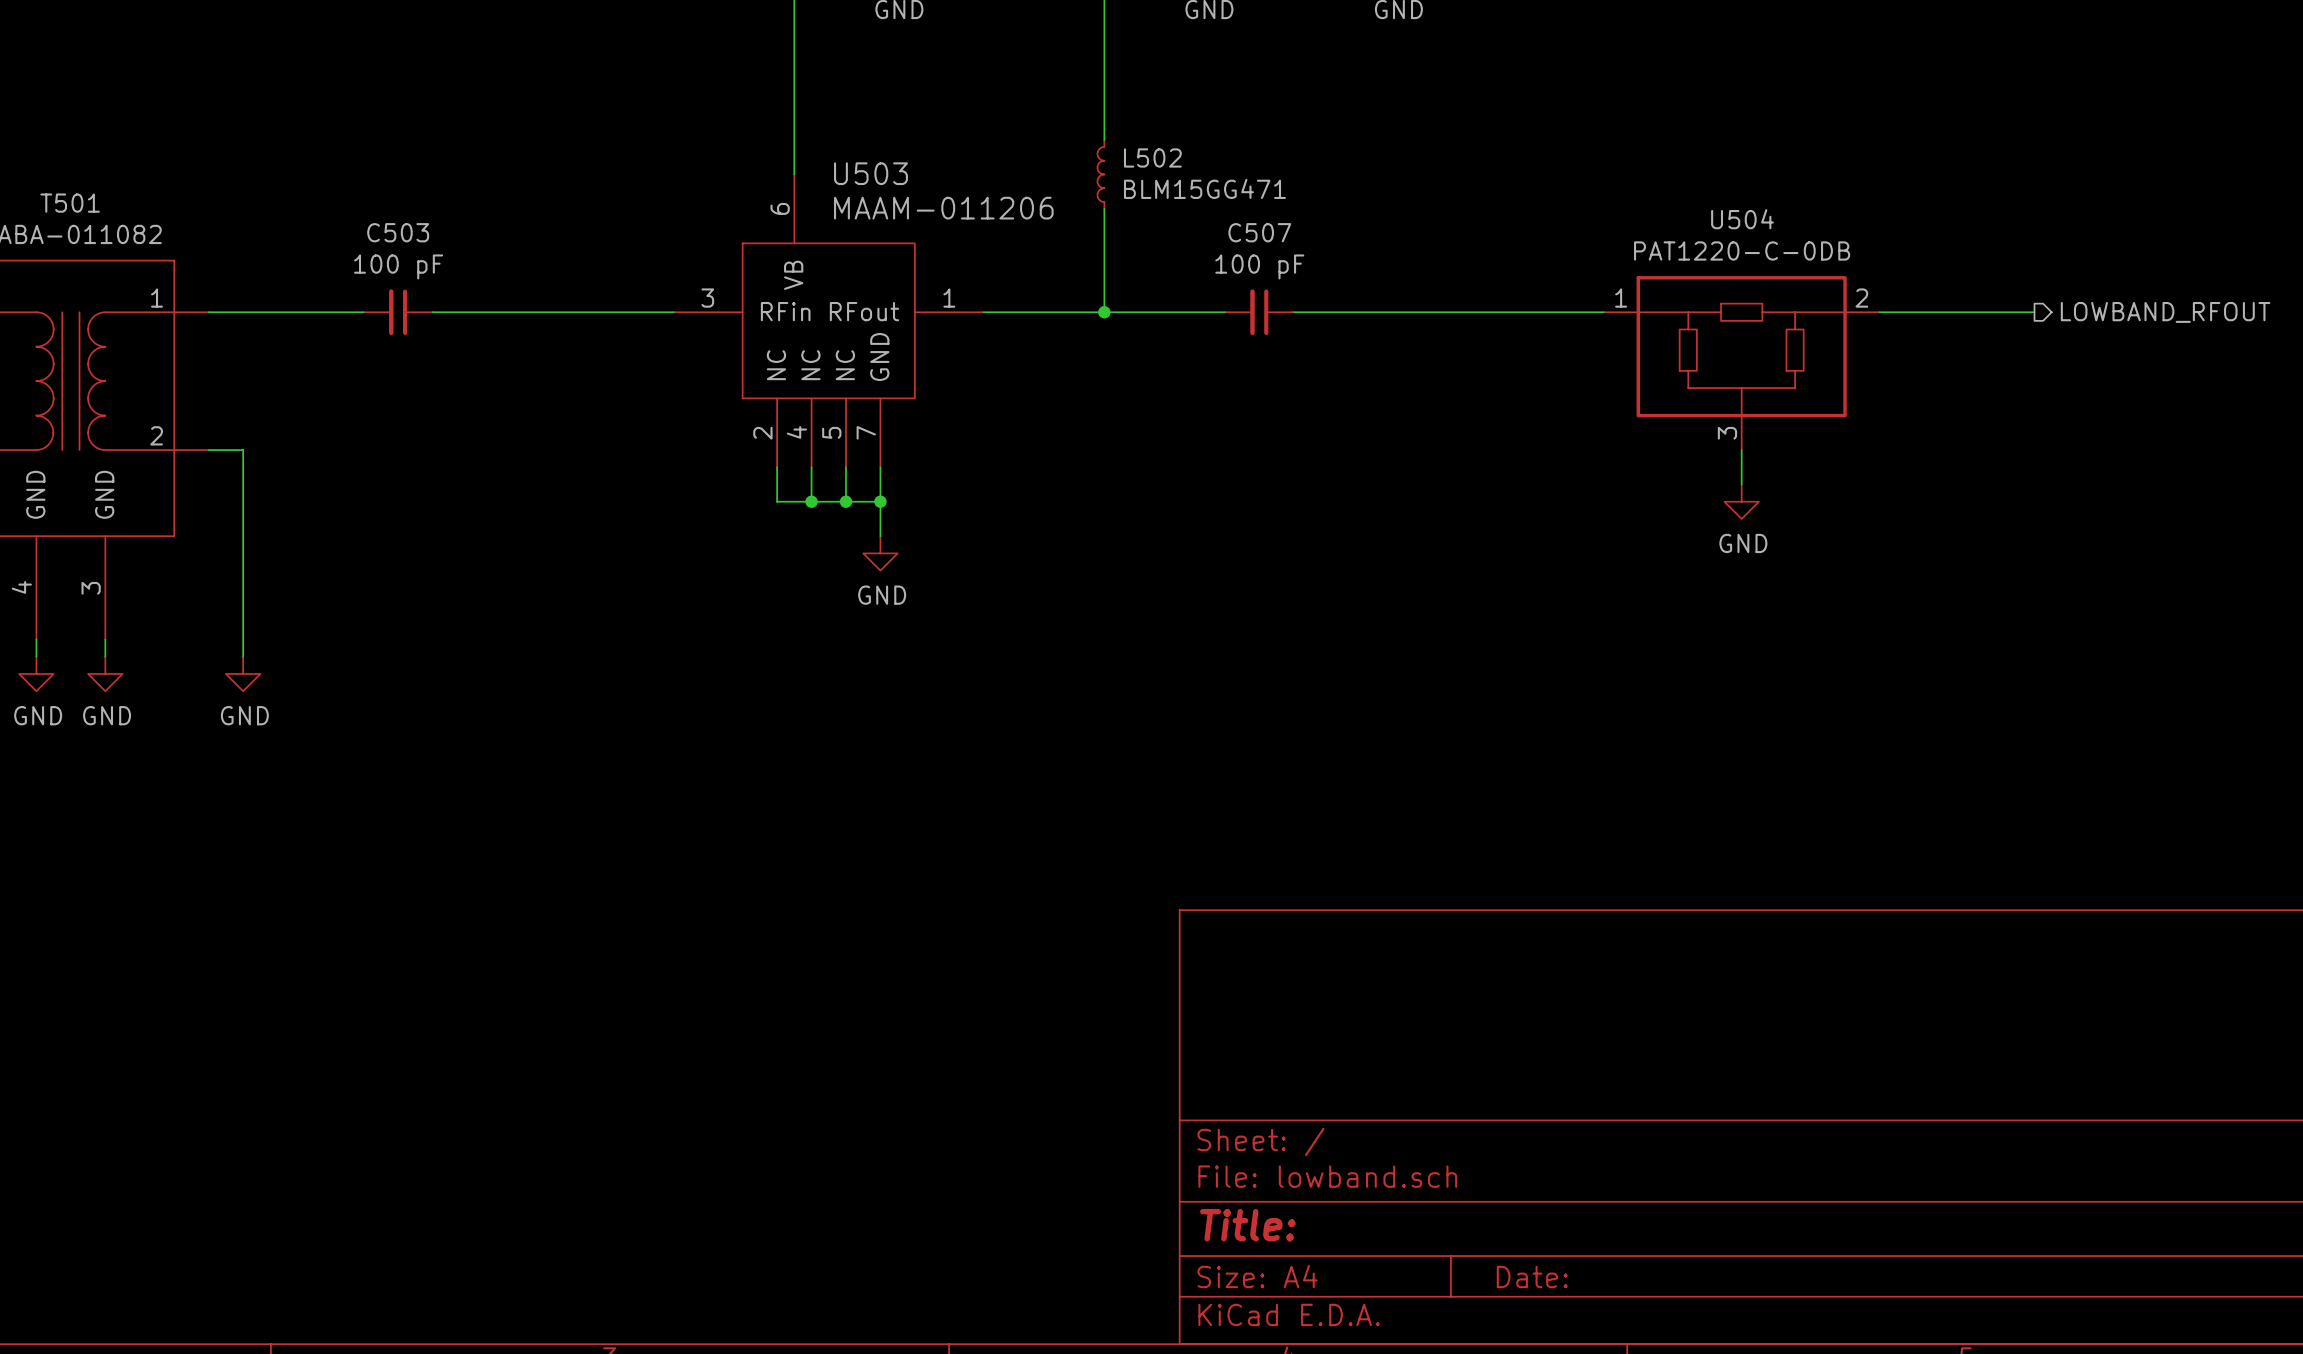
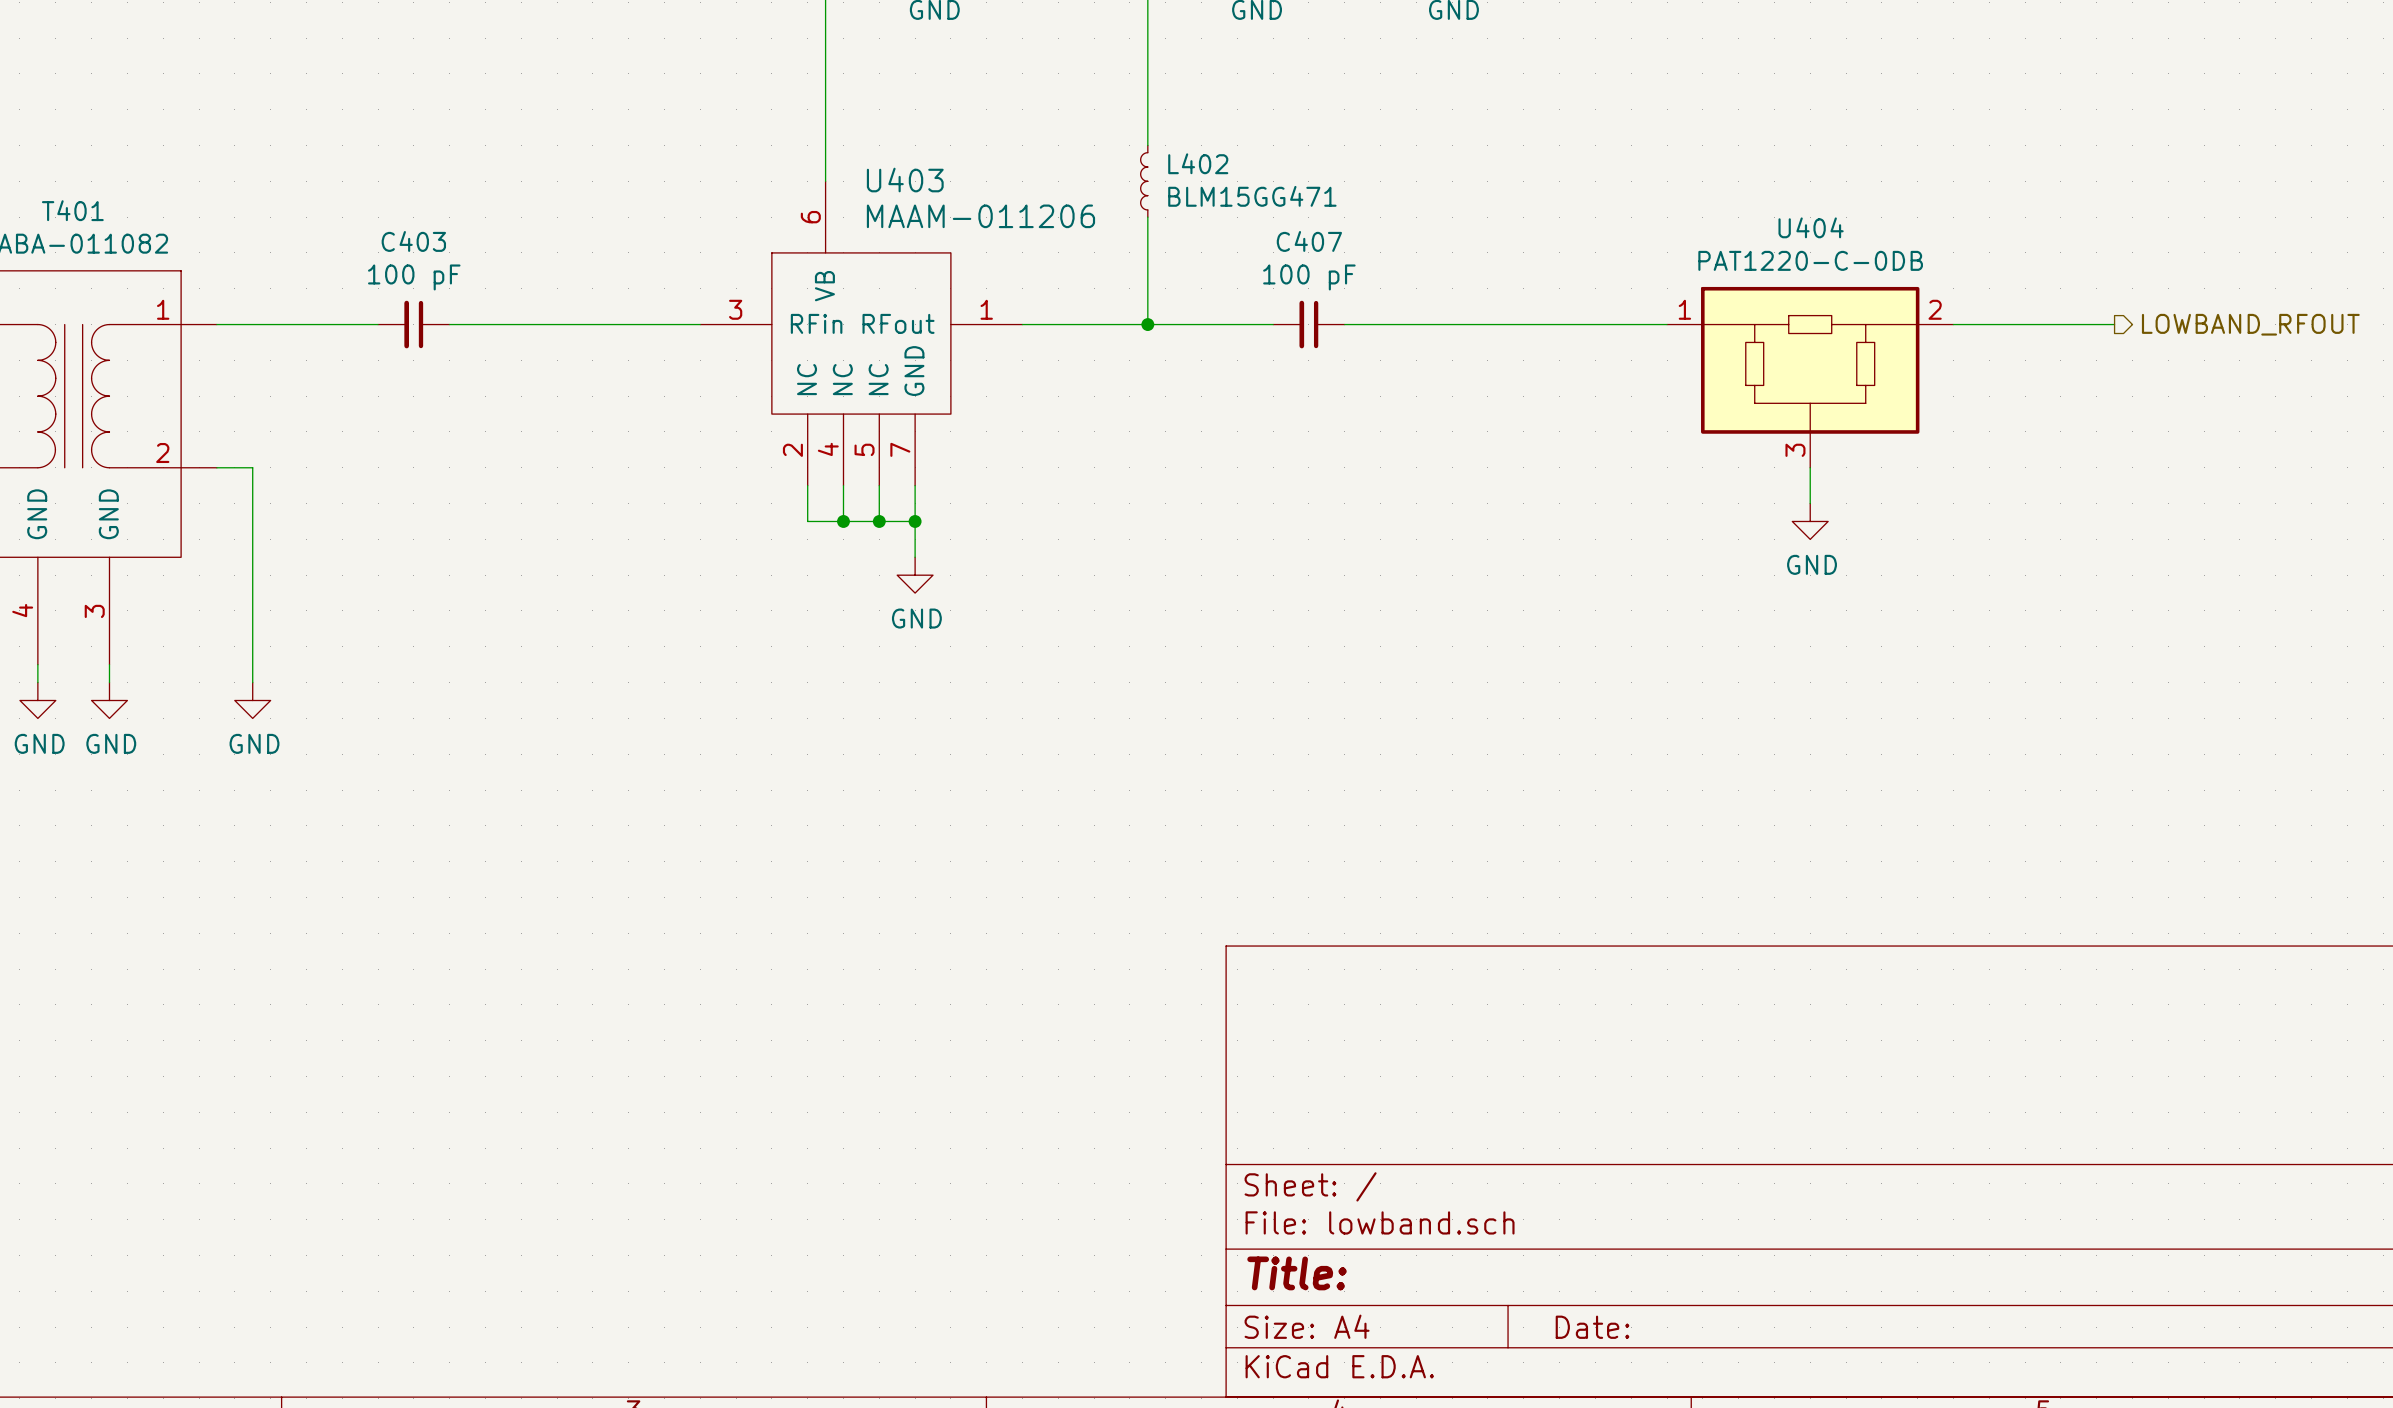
L502 name: L502 (1152, 157) -> L402 (1198, 163)
U503 name: U503 (870, 173) -> U403 (905, 180)
T501 name: T501 (70, 203) -> T401 (72, 210)
U504 name: U504 (1742, 219) -> U404 (1811, 227)
C503 name: C503 (398, 232) -> C403 (413, 241)
C507 name: C507 (1259, 232) -> C407 (1309, 241)

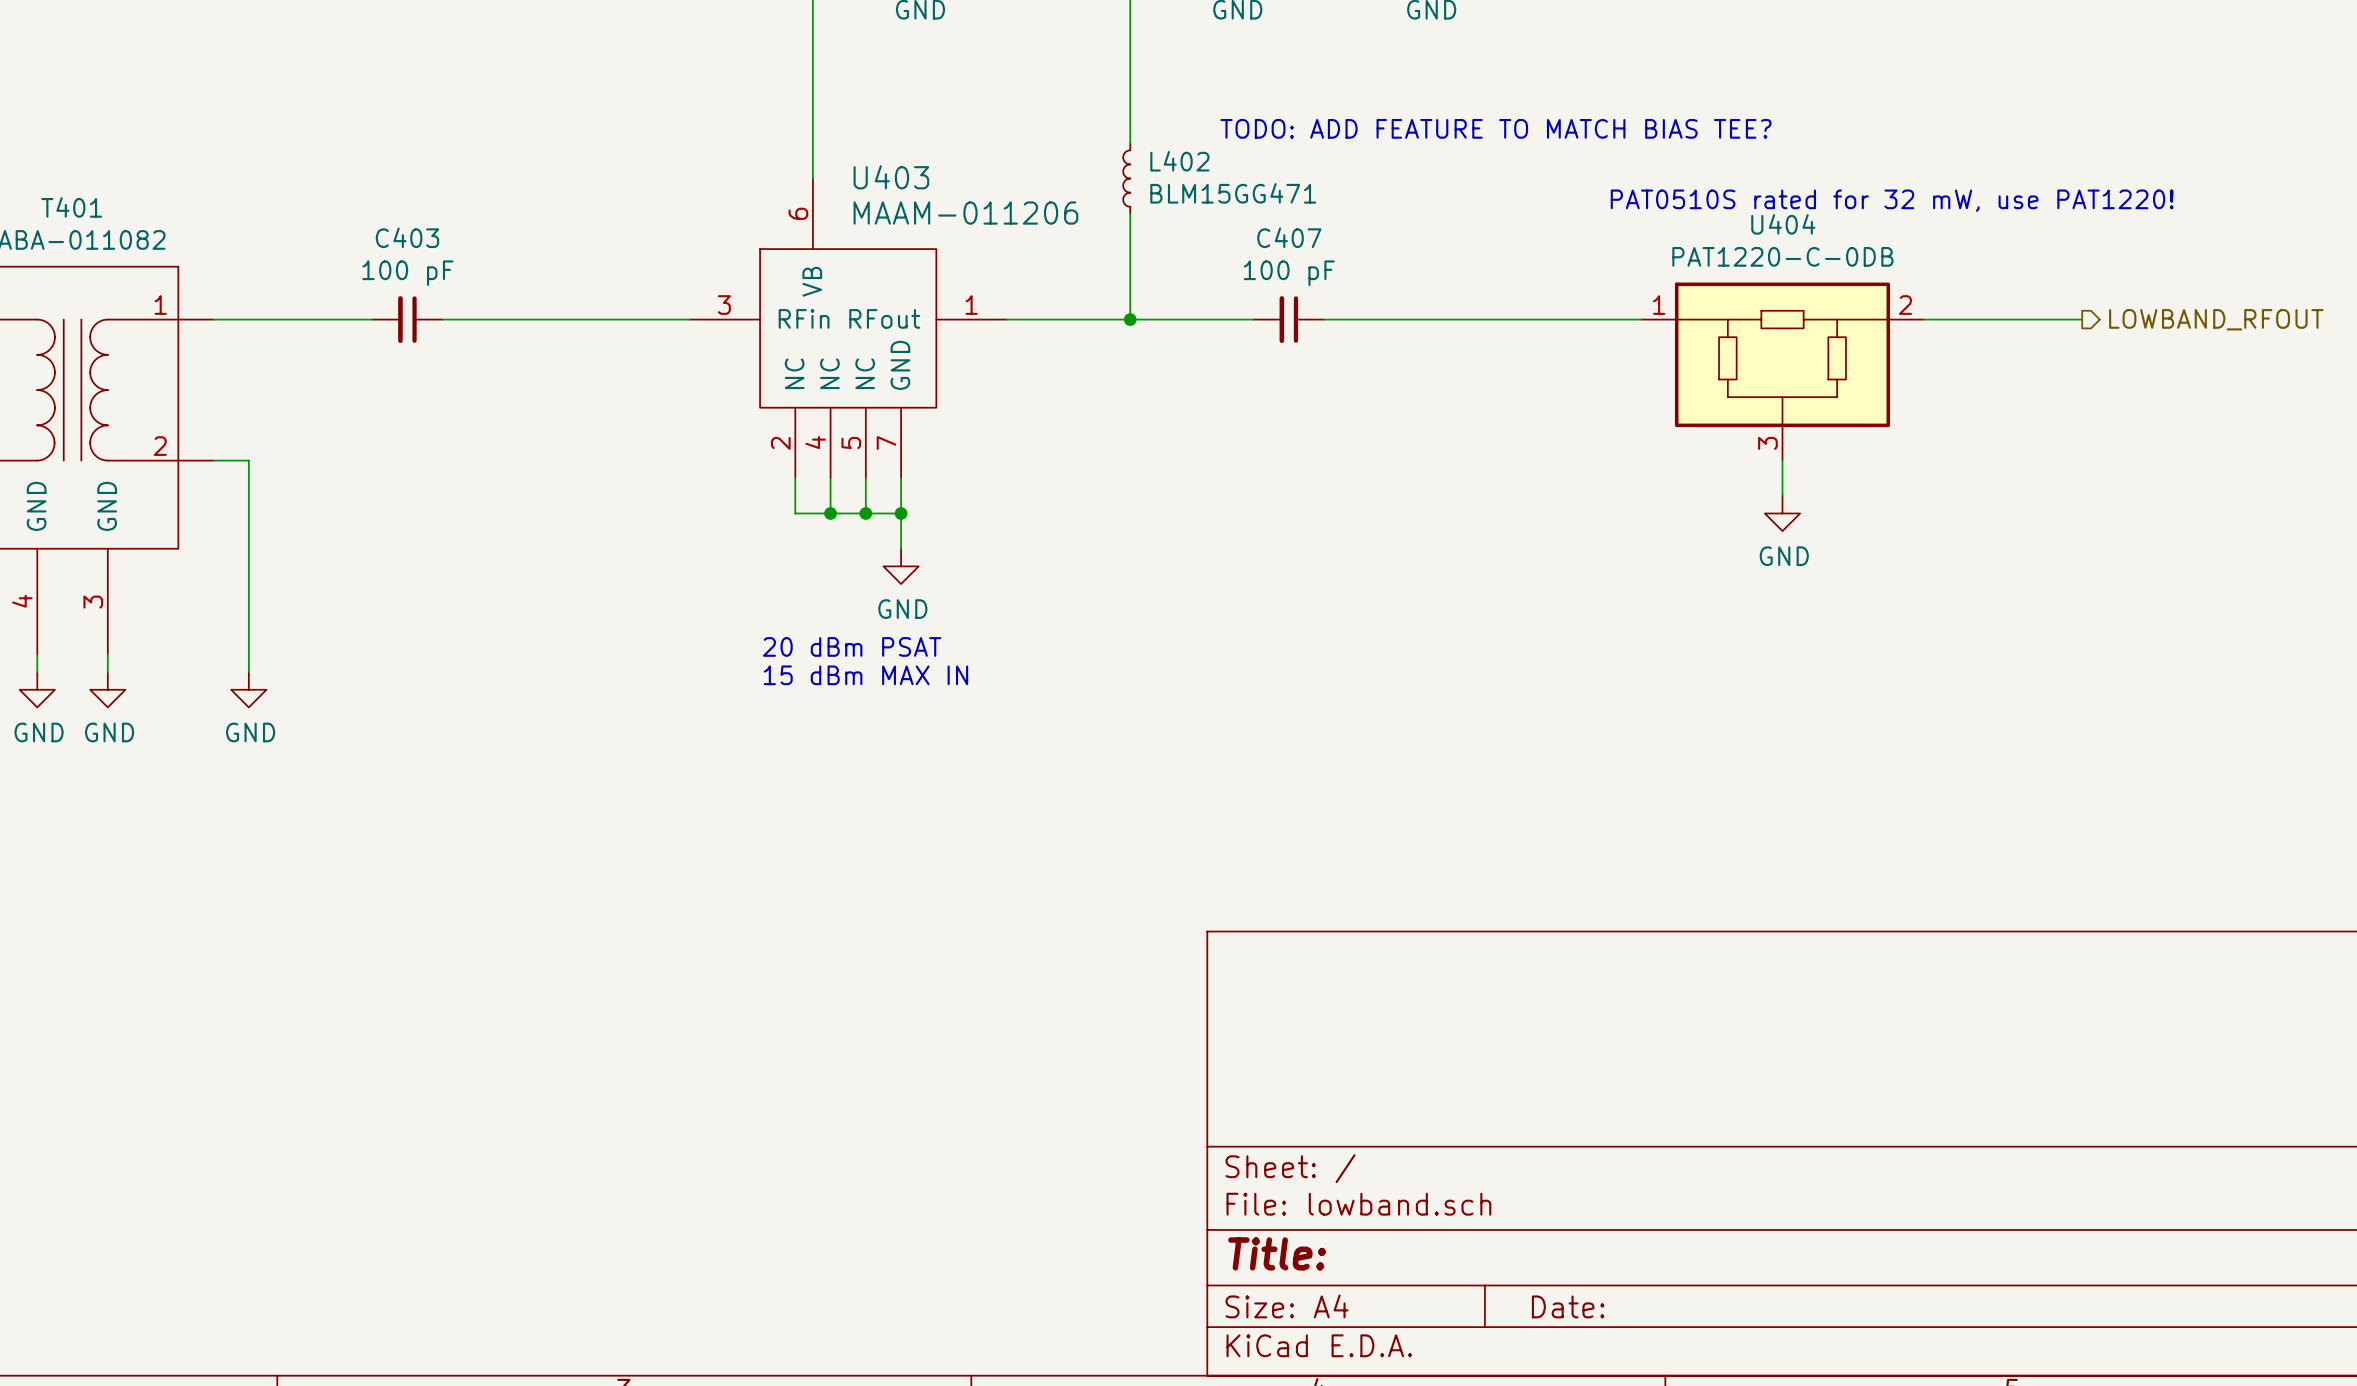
text: none -> TODO: ADD FEATURE TO MATCH BIAS TEE? (1495, 128)
text: none -> PAT0510S rated for 32 mW, use PAT1220! (1892, 200)
text: none -> 20 dBm PSAT (852, 646)
text: none -> 15 dBm MAX IN (865, 675)

